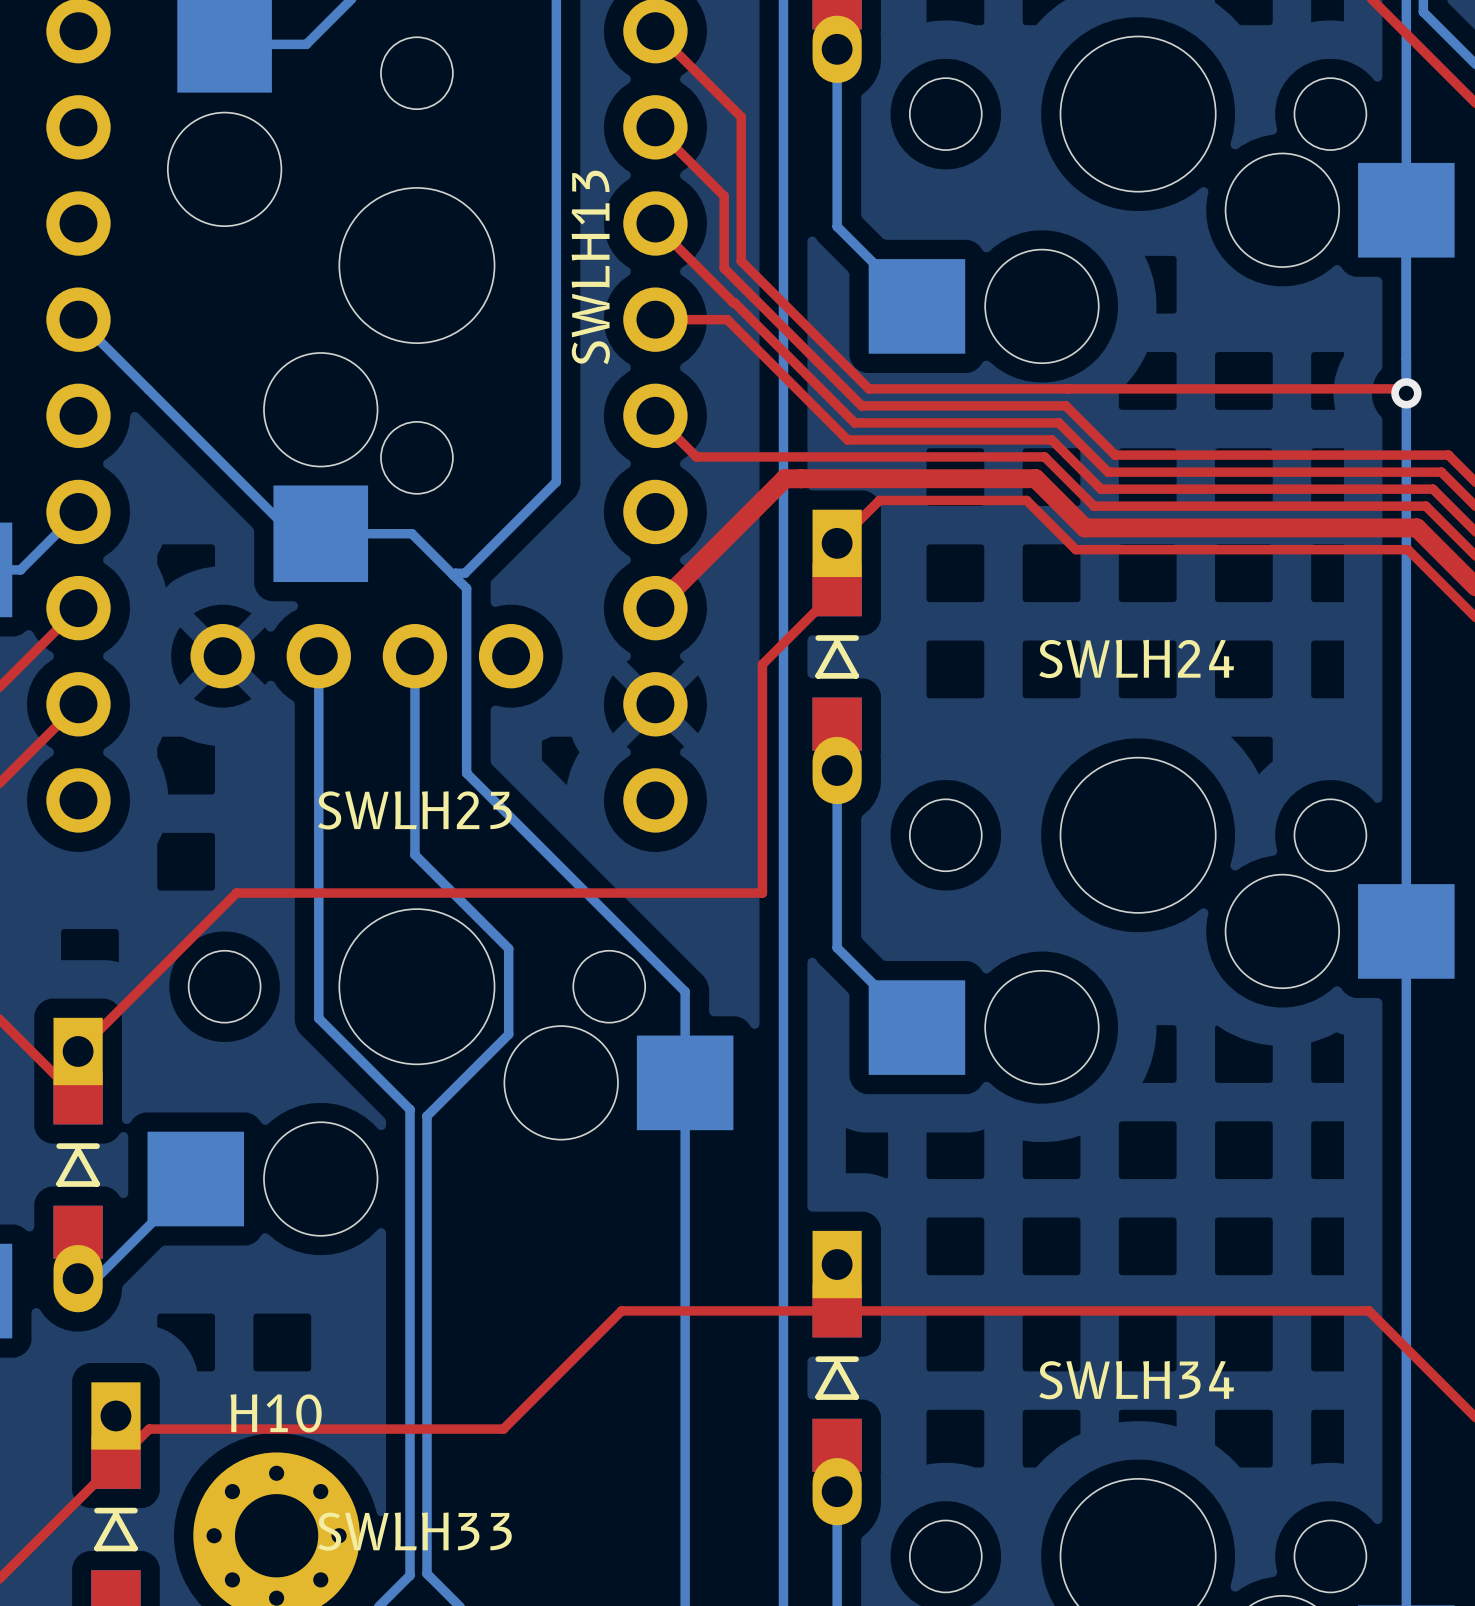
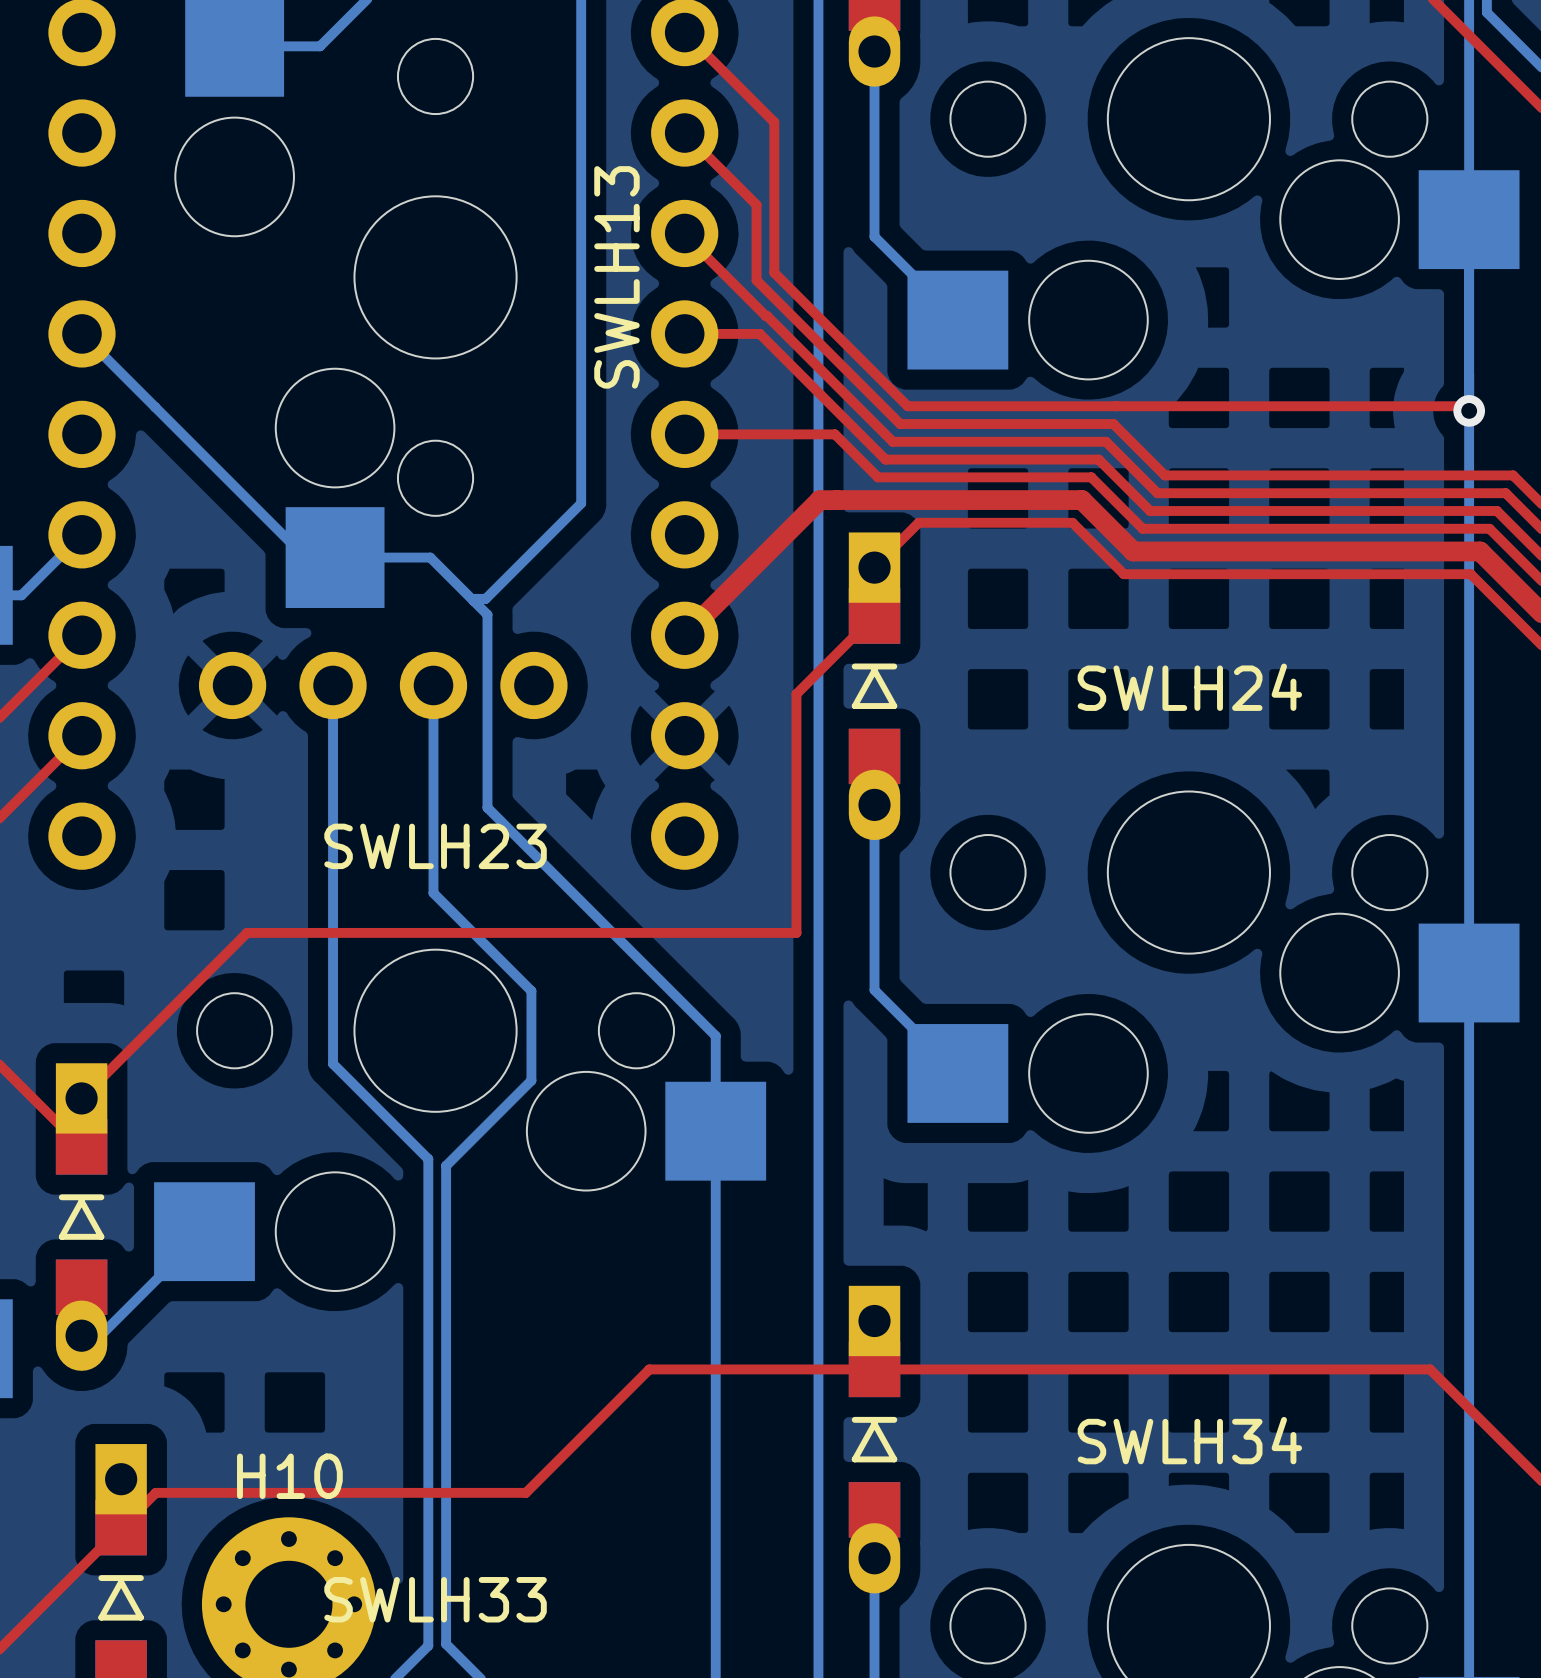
top track: (655, 415) (696, 456) (840, 456) -> (684, 434) (835, 434) (877, 477)

